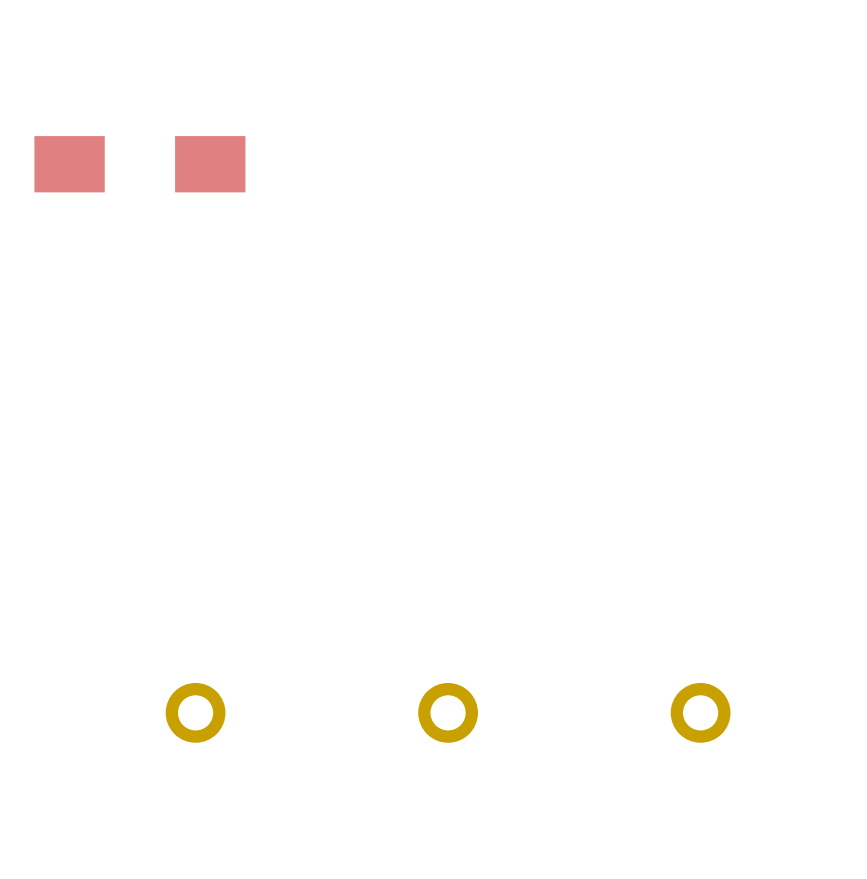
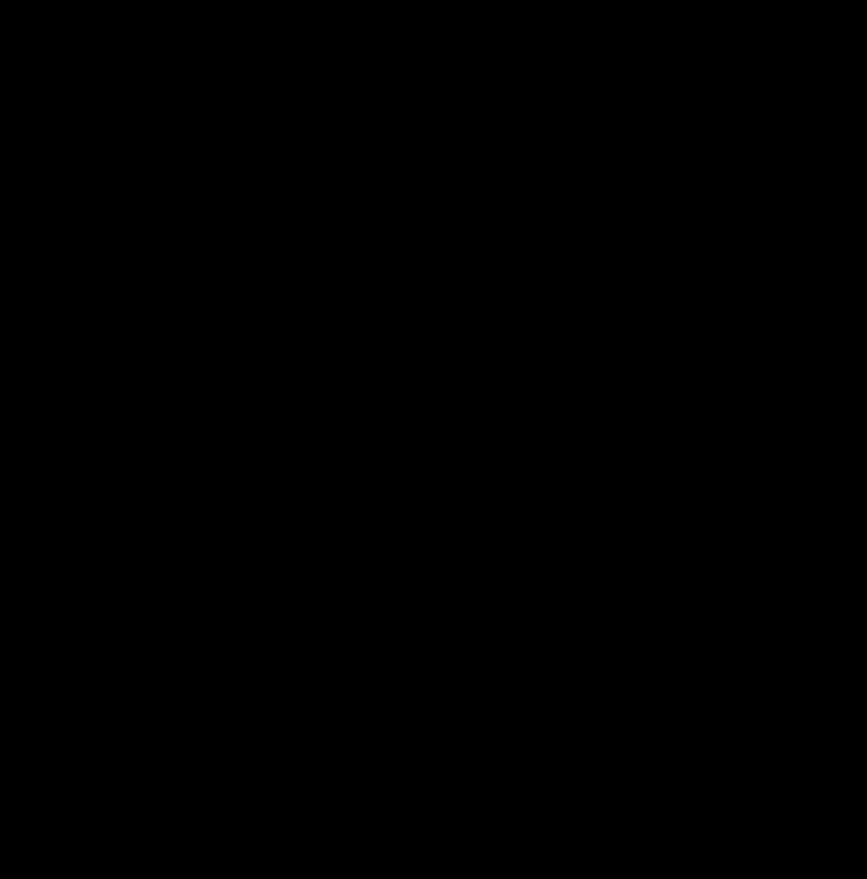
part: (139, 164) -> none
part: (195, 712) -> none
part: (448, 712) -> none
part: (700, 712) -> none

